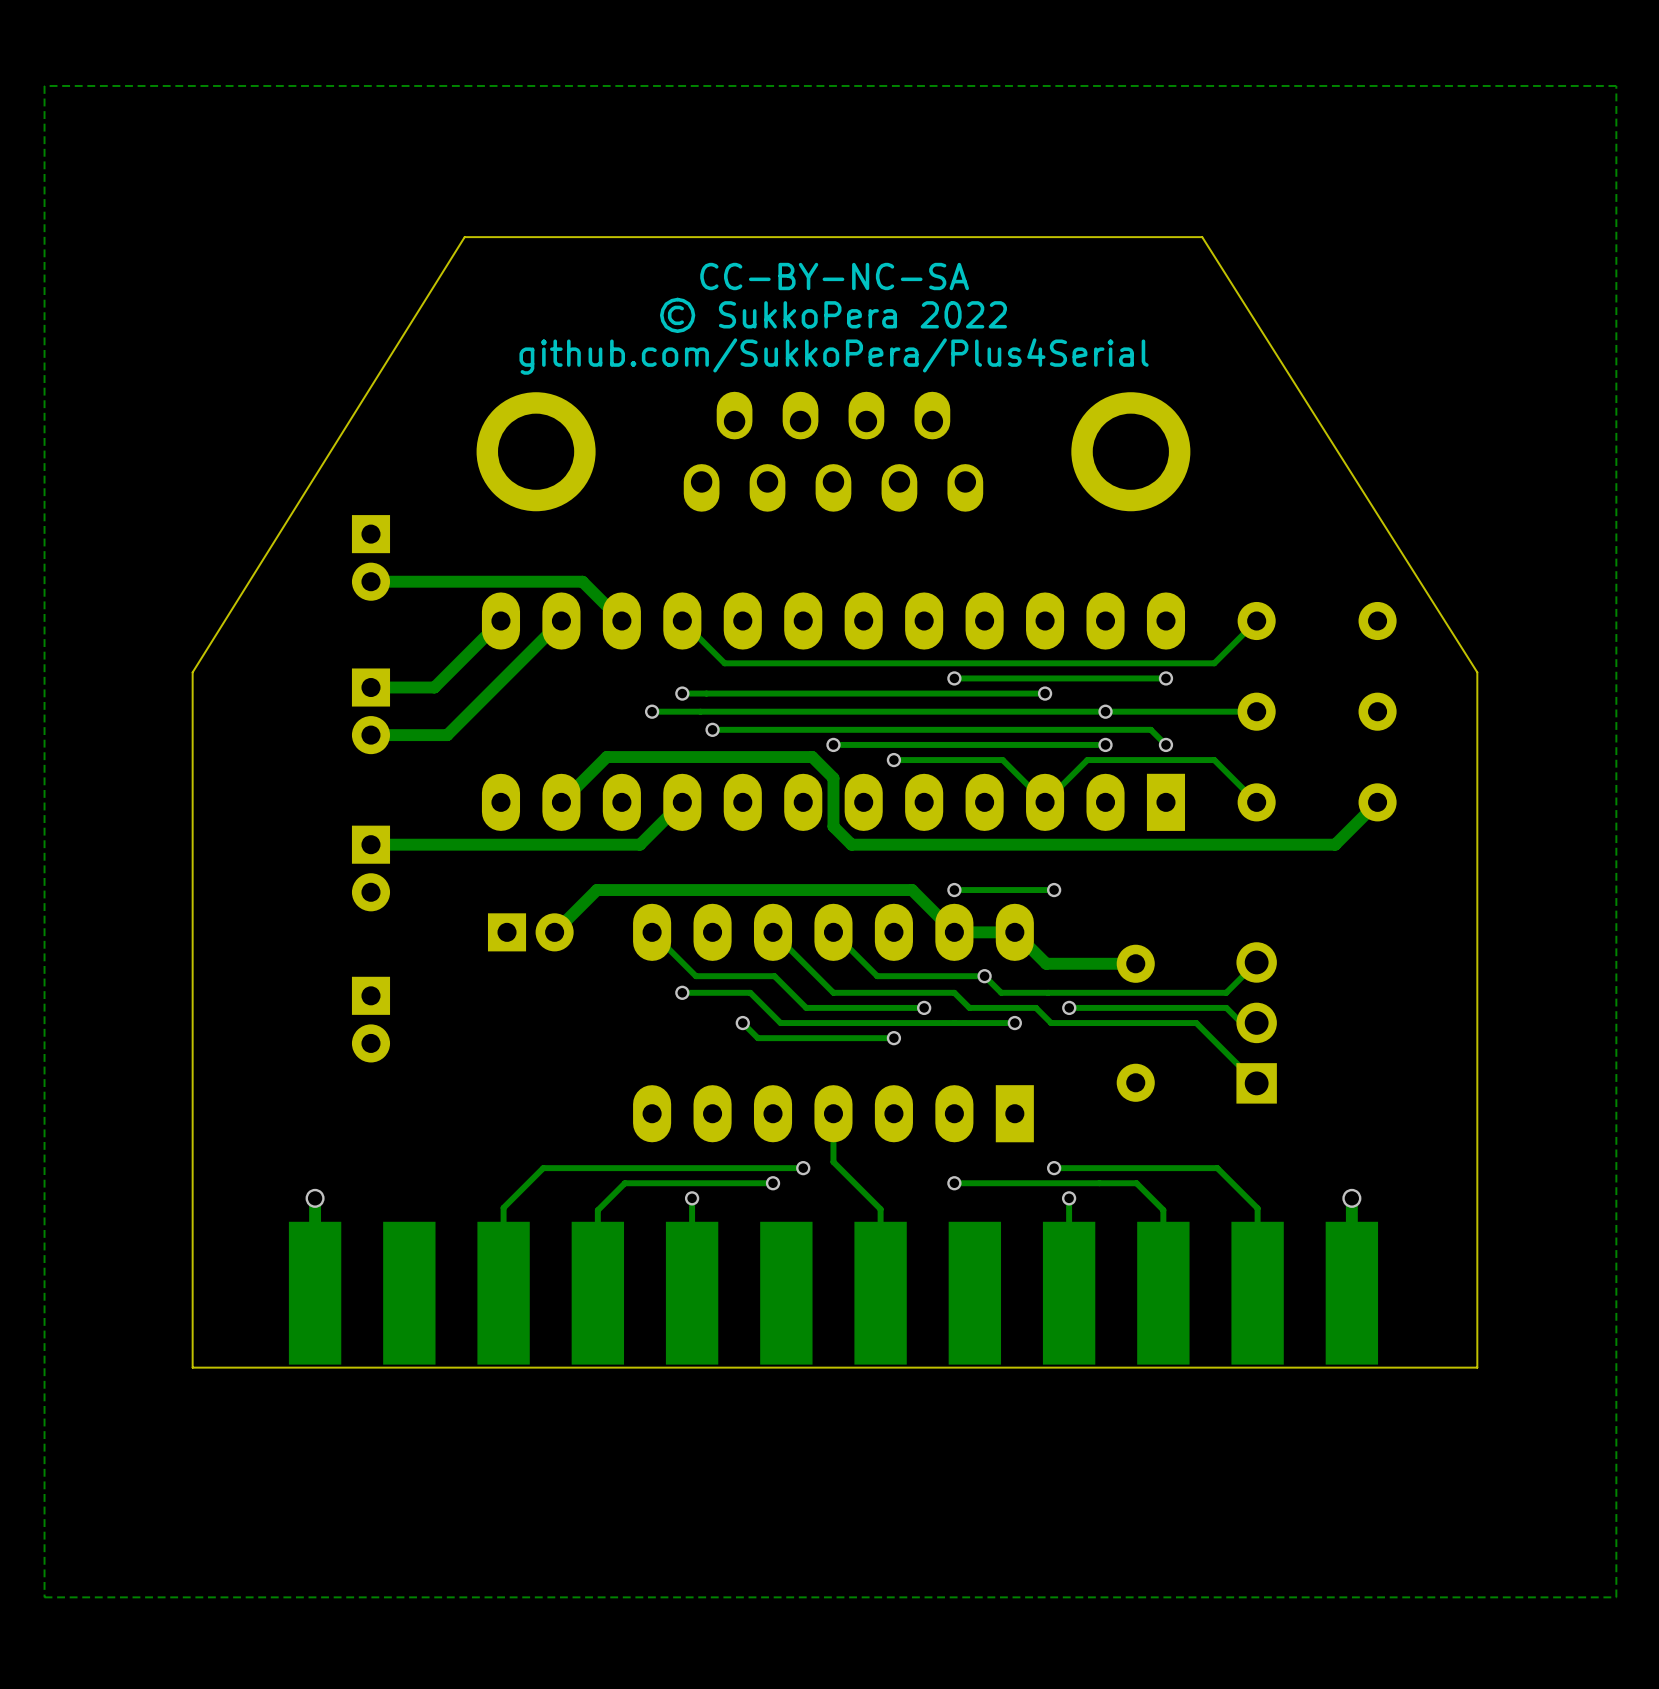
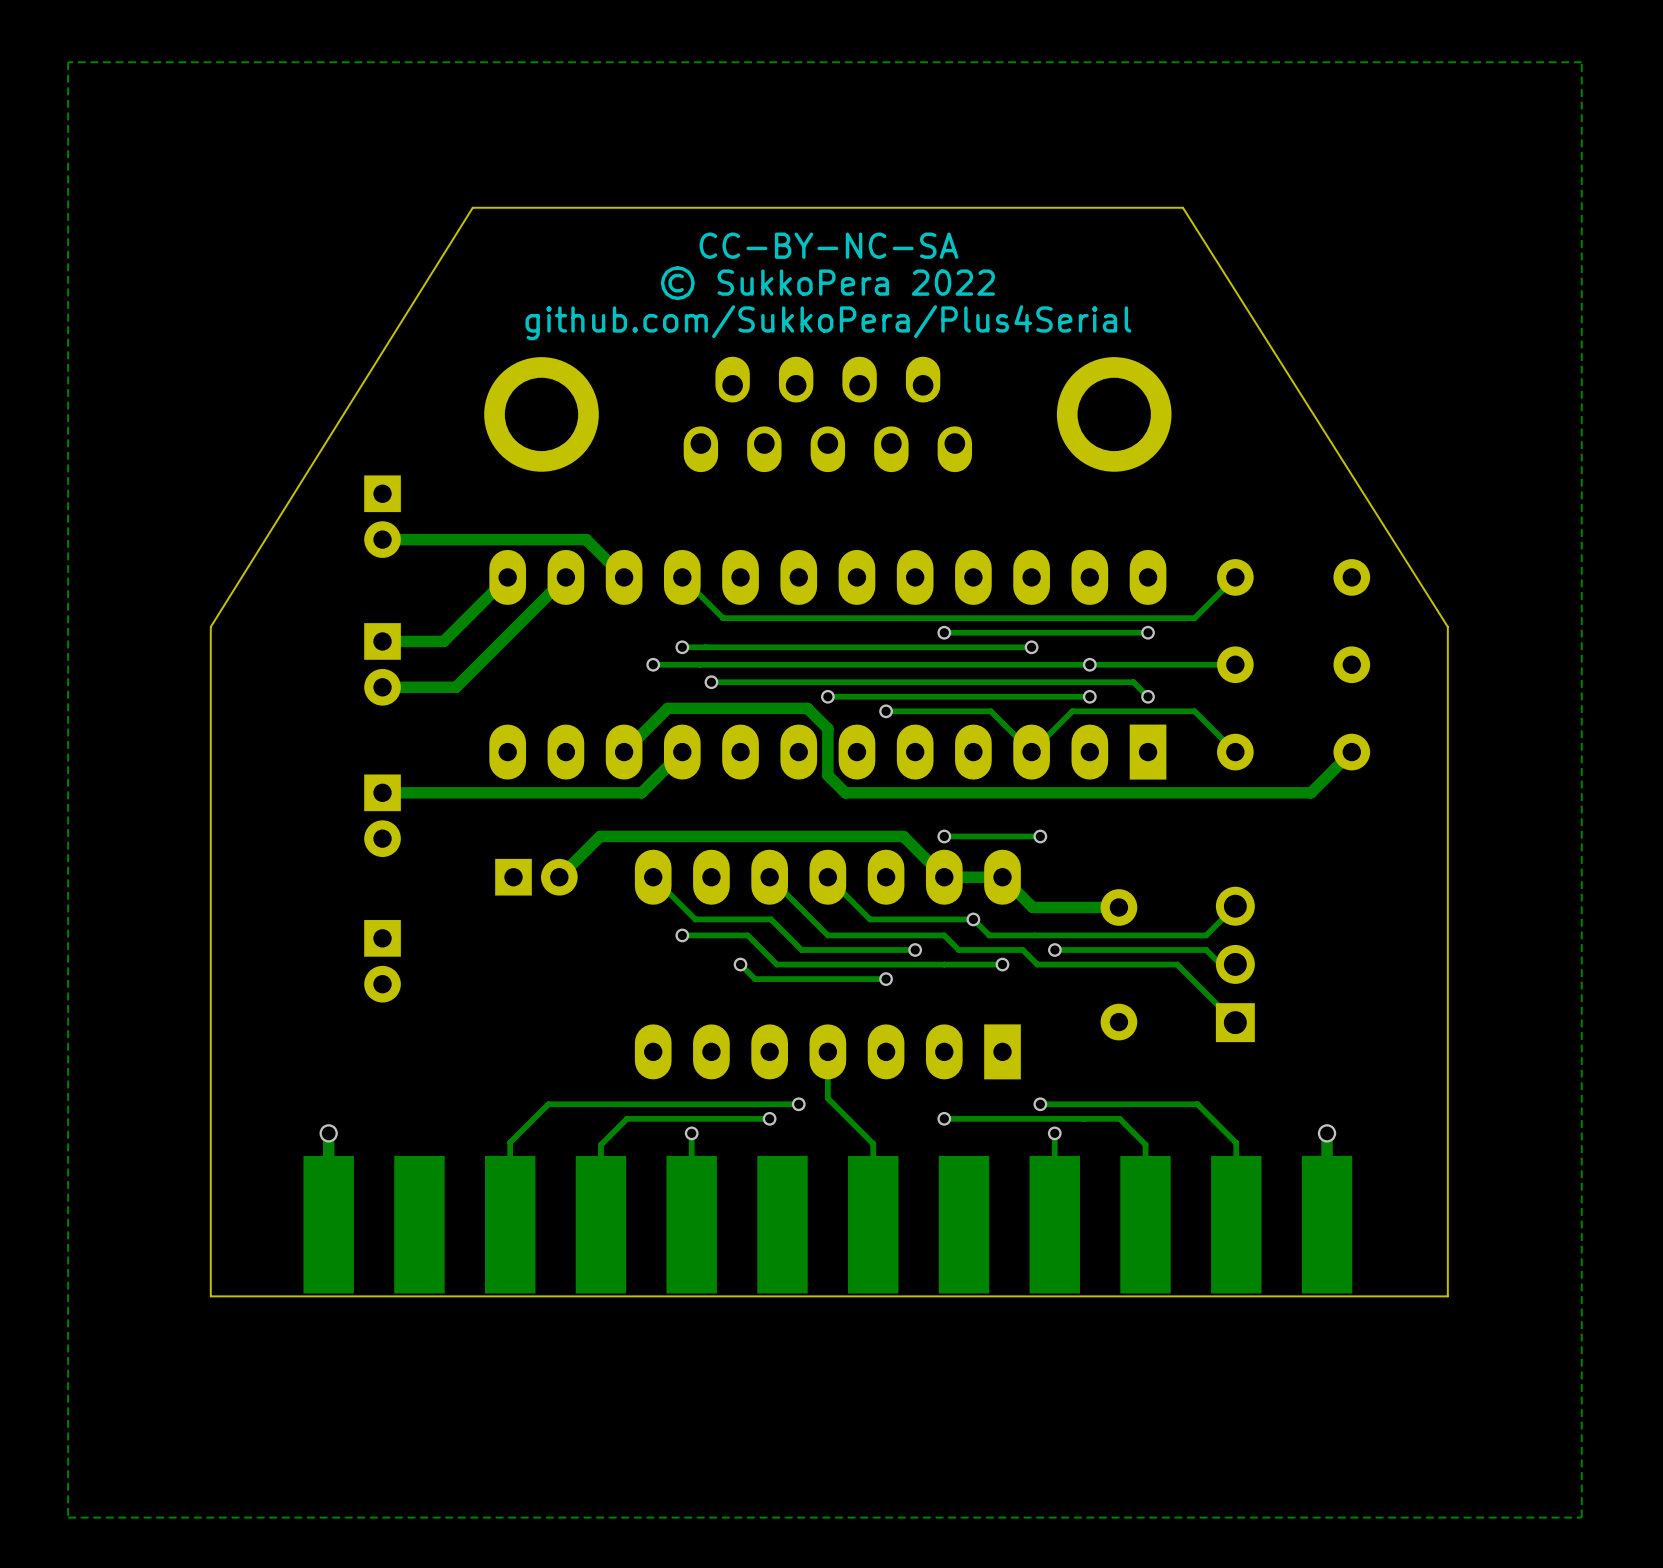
track: (667, 757) (606, 757) (561, 802) -> (667, 708) (624, 752)

